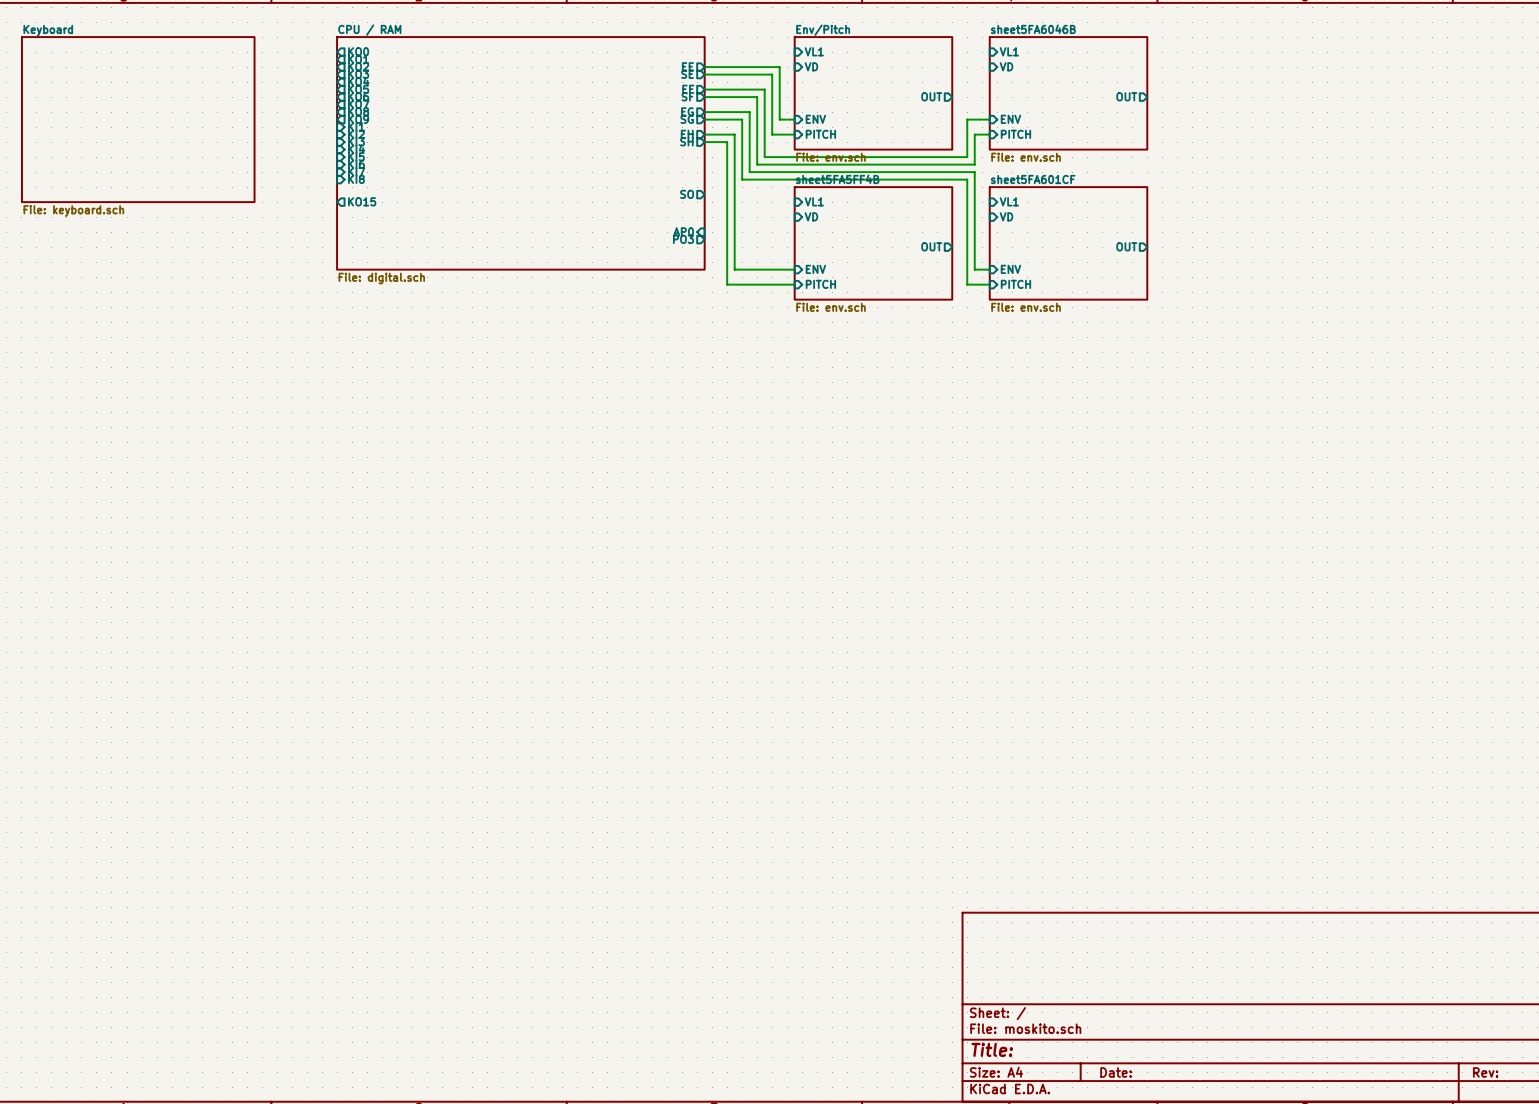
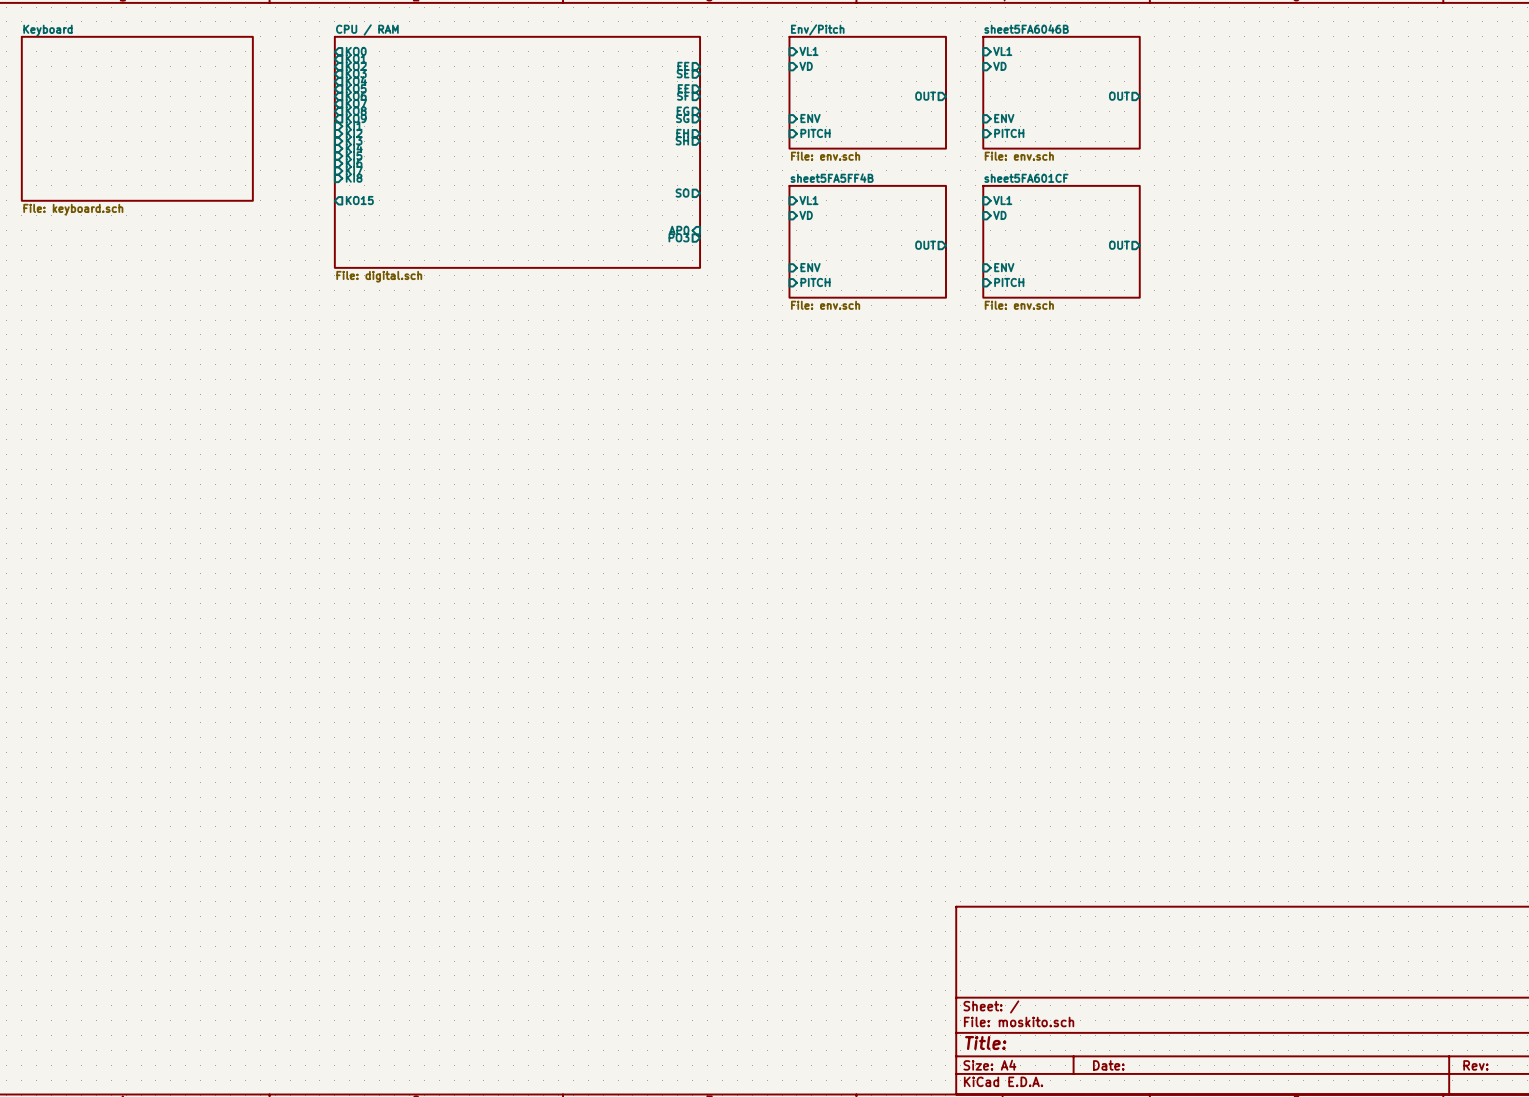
wire: (704, 67) (779, 67) (779, 119) (794, 119) -> none
wire: (704, 74) (772, 74) (772, 134) (794, 134) -> none
wire: (704, 89) (764, 89) (764, 157) (967, 157) (967, 119) (989, 119) -> none
wire: (704, 97) (757, 97) (757, 164) (974, 164) (974, 134) (989, 134) -> none
wire: (704, 112) (749, 112) (749, 172) (974, 172) (974, 269) (989, 269) -> none
wire: (704, 119) (742, 119) (742, 179) (967, 179) (967, 284) (989, 284) -> none
wire: (704, 134) (734, 134) (734, 269) (794, 269) -> none
wire: (704, 142) (727, 142) (727, 284) (794, 284) -> none

